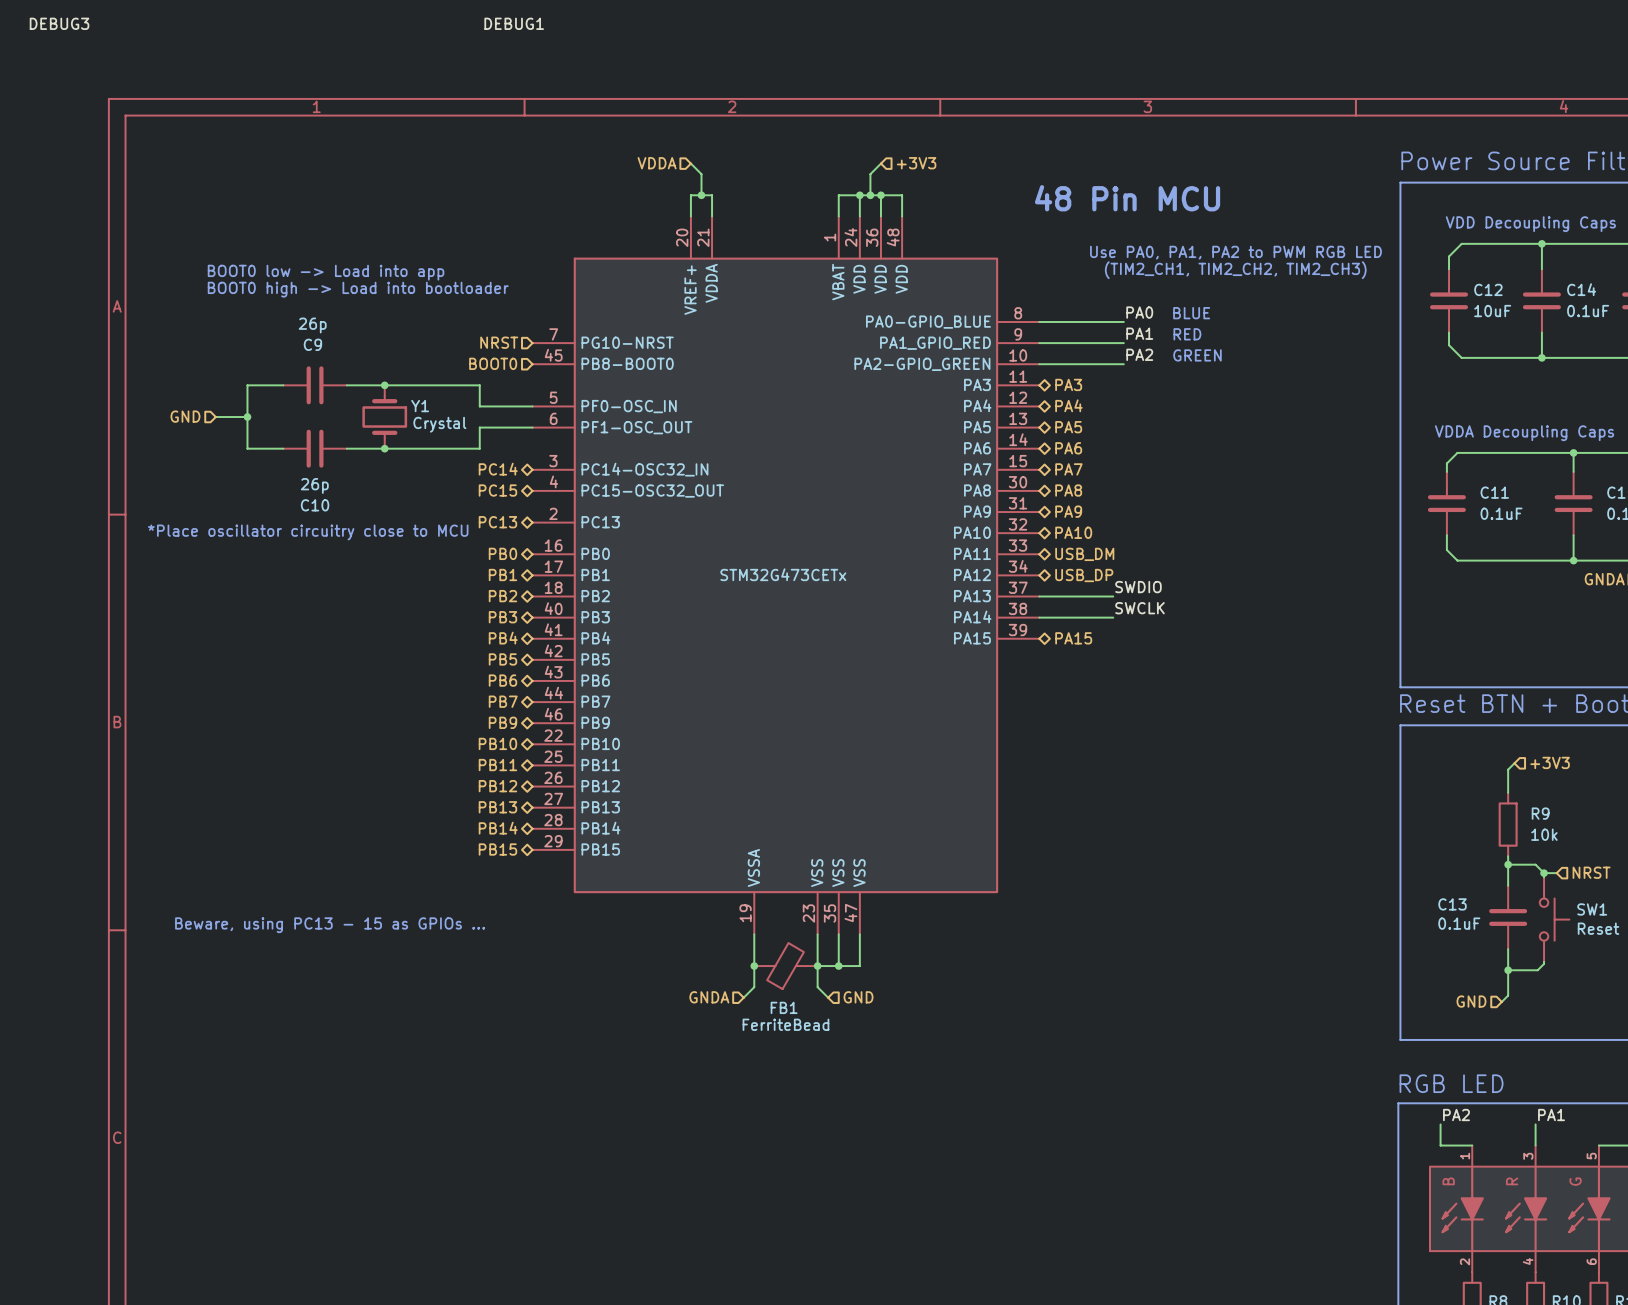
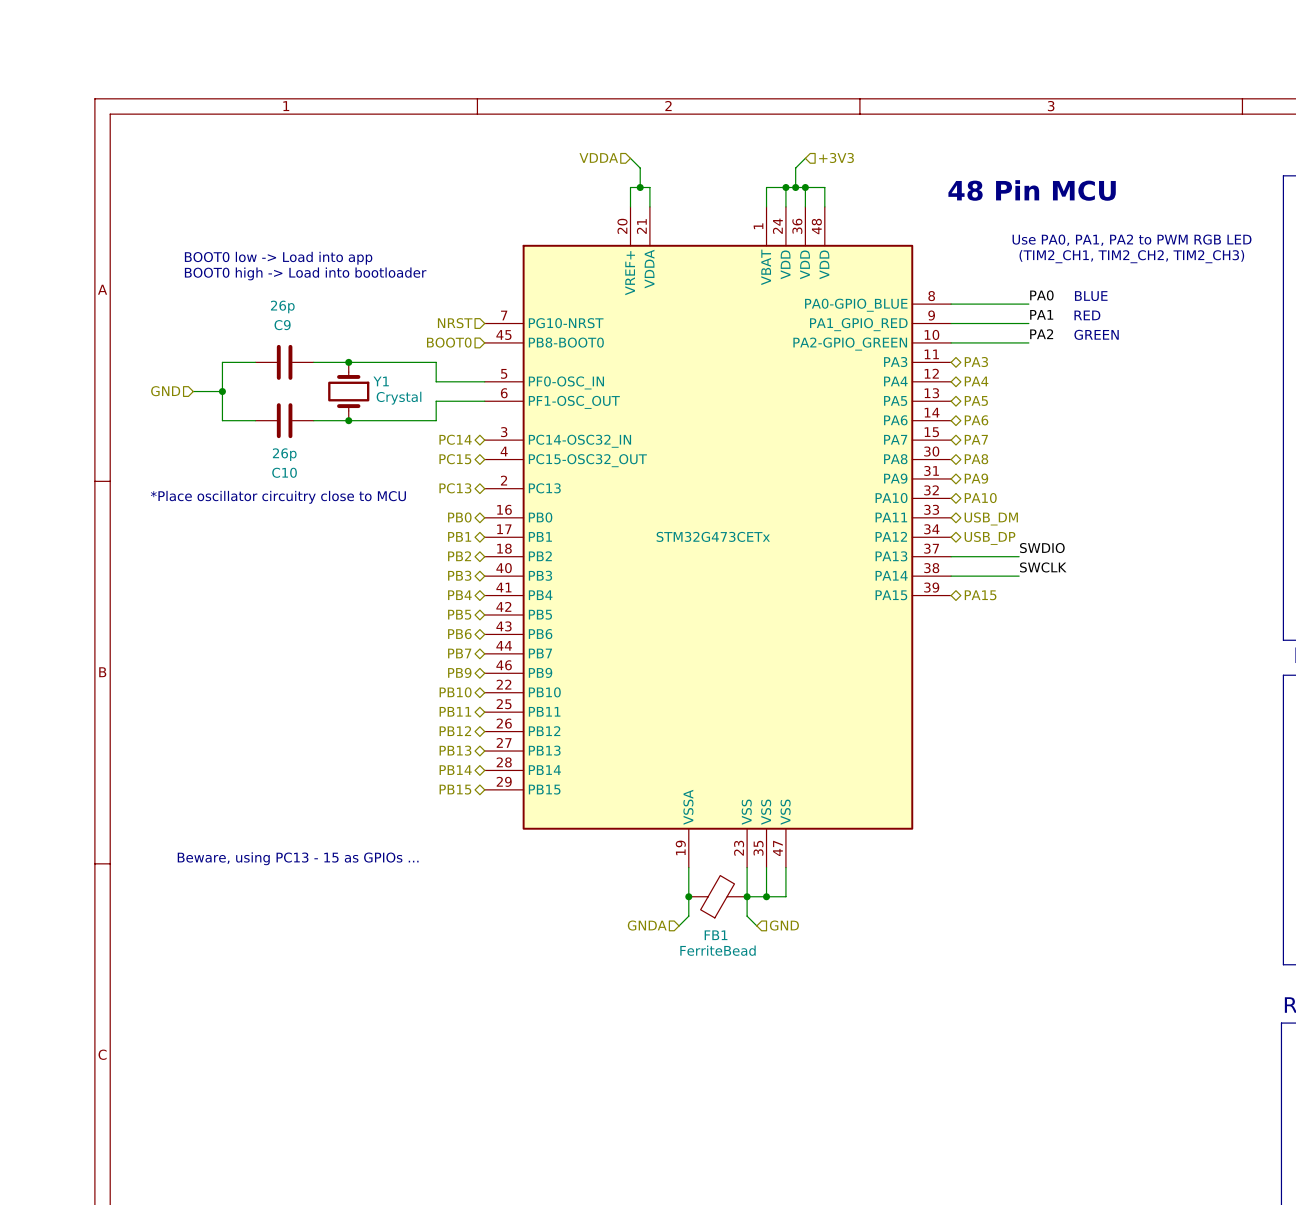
label: DEBUG3 (59, 23) -> none
label: DEBUG1 (514, 23) -> none

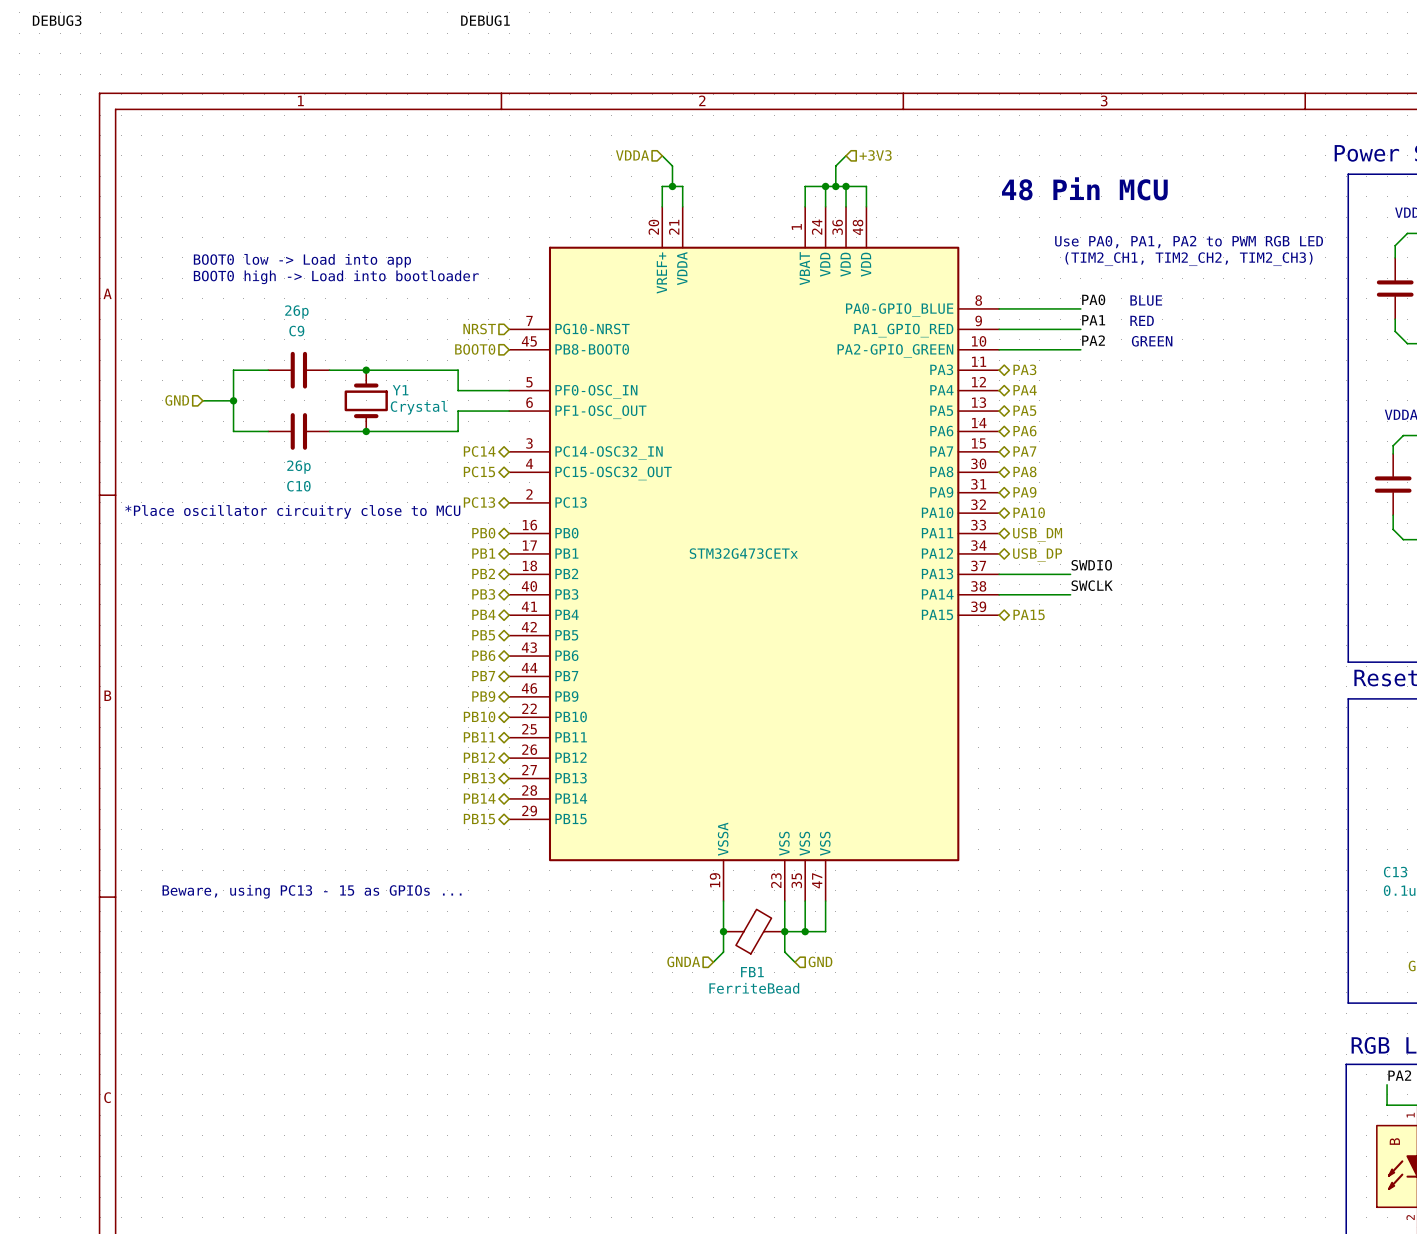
label: none -> DEBUG3 (57, 20)
label: none -> DEBUG1 (485, 20)

